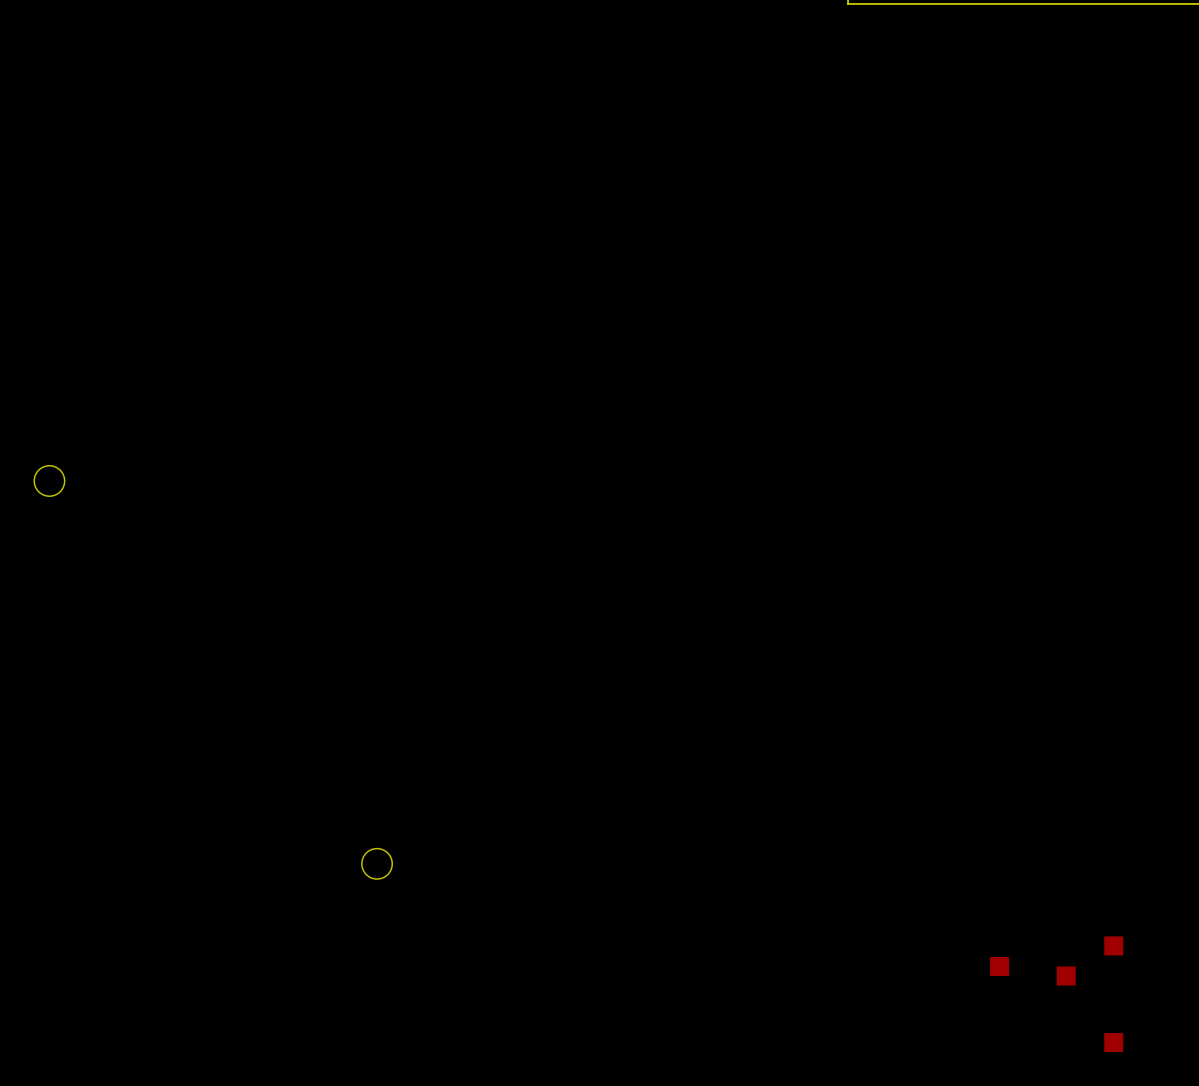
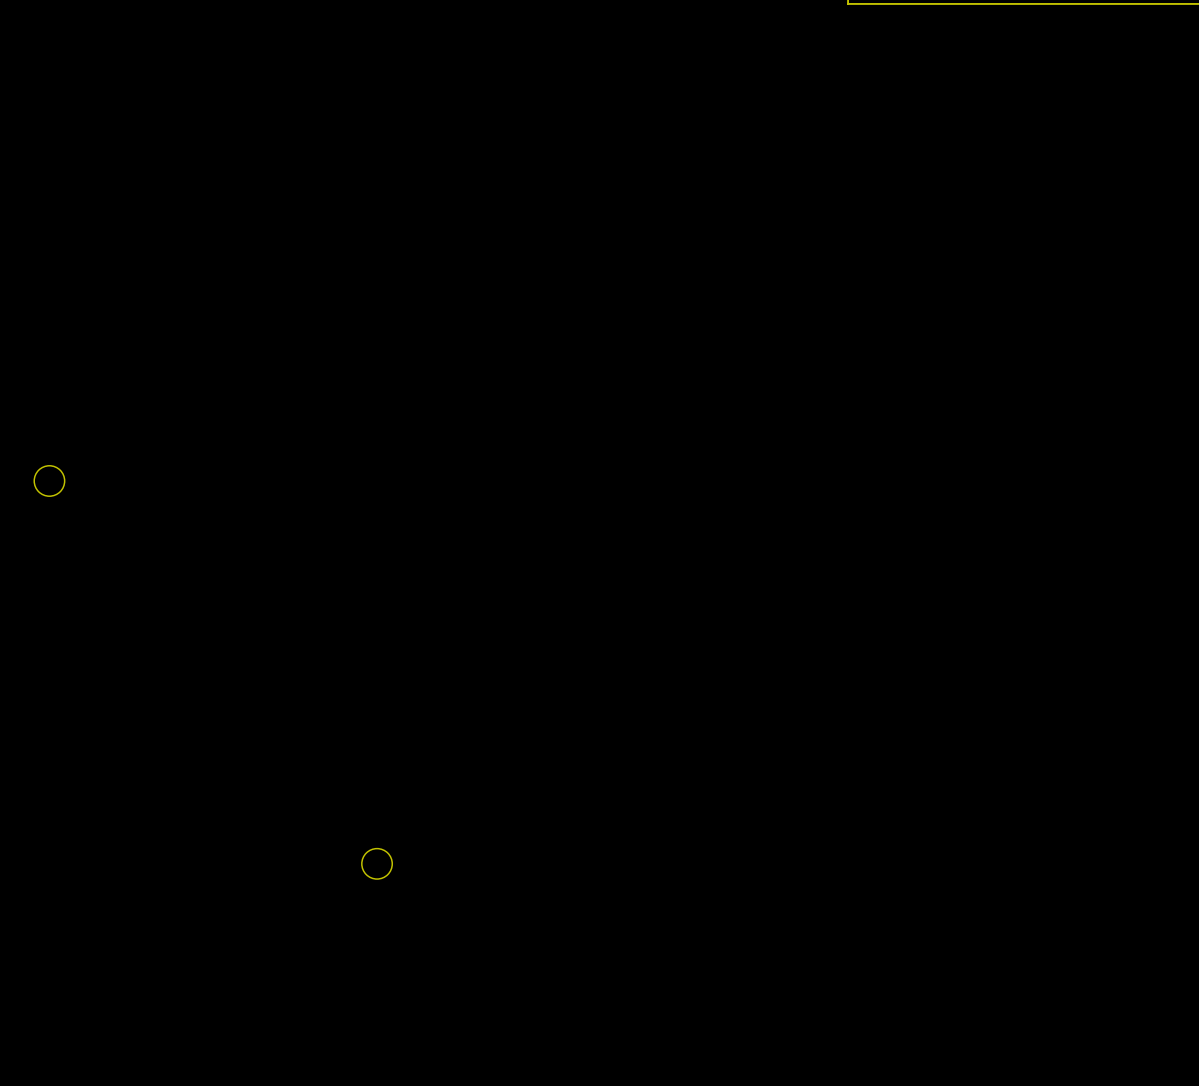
part: (1113, 945) -> none
part: (999, 966) -> none
part: (1066, 976) -> none
part: (1113, 1042) -> none

